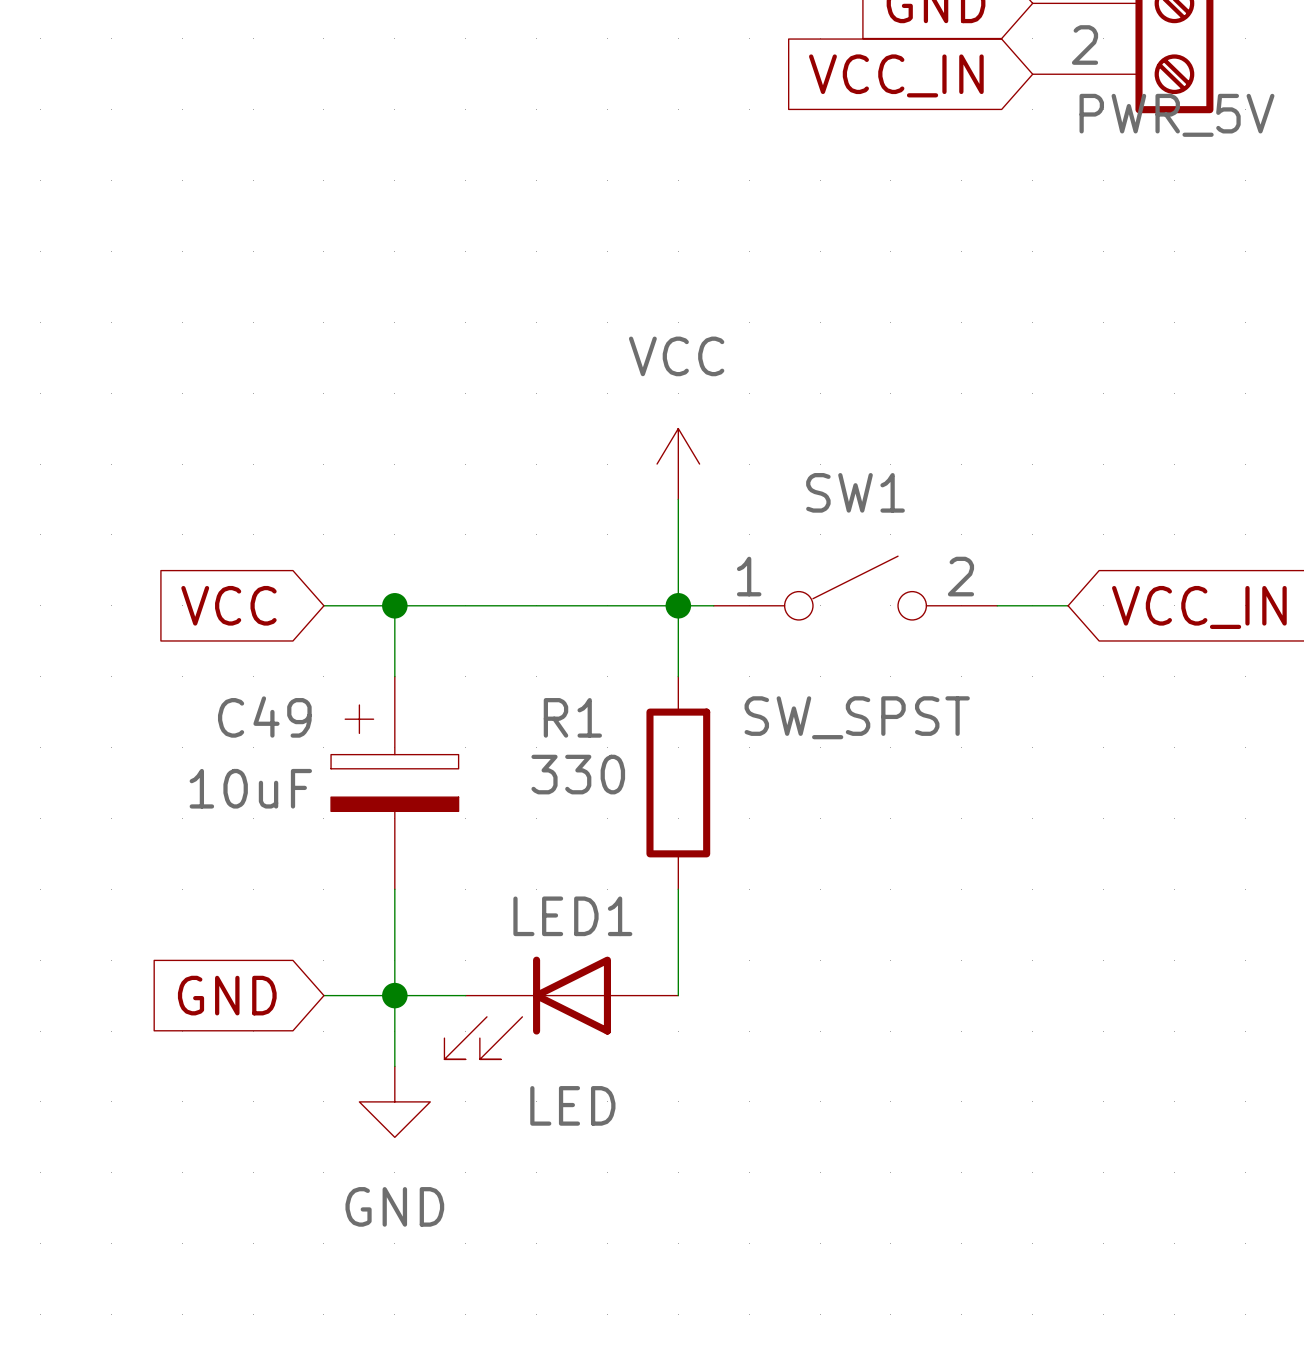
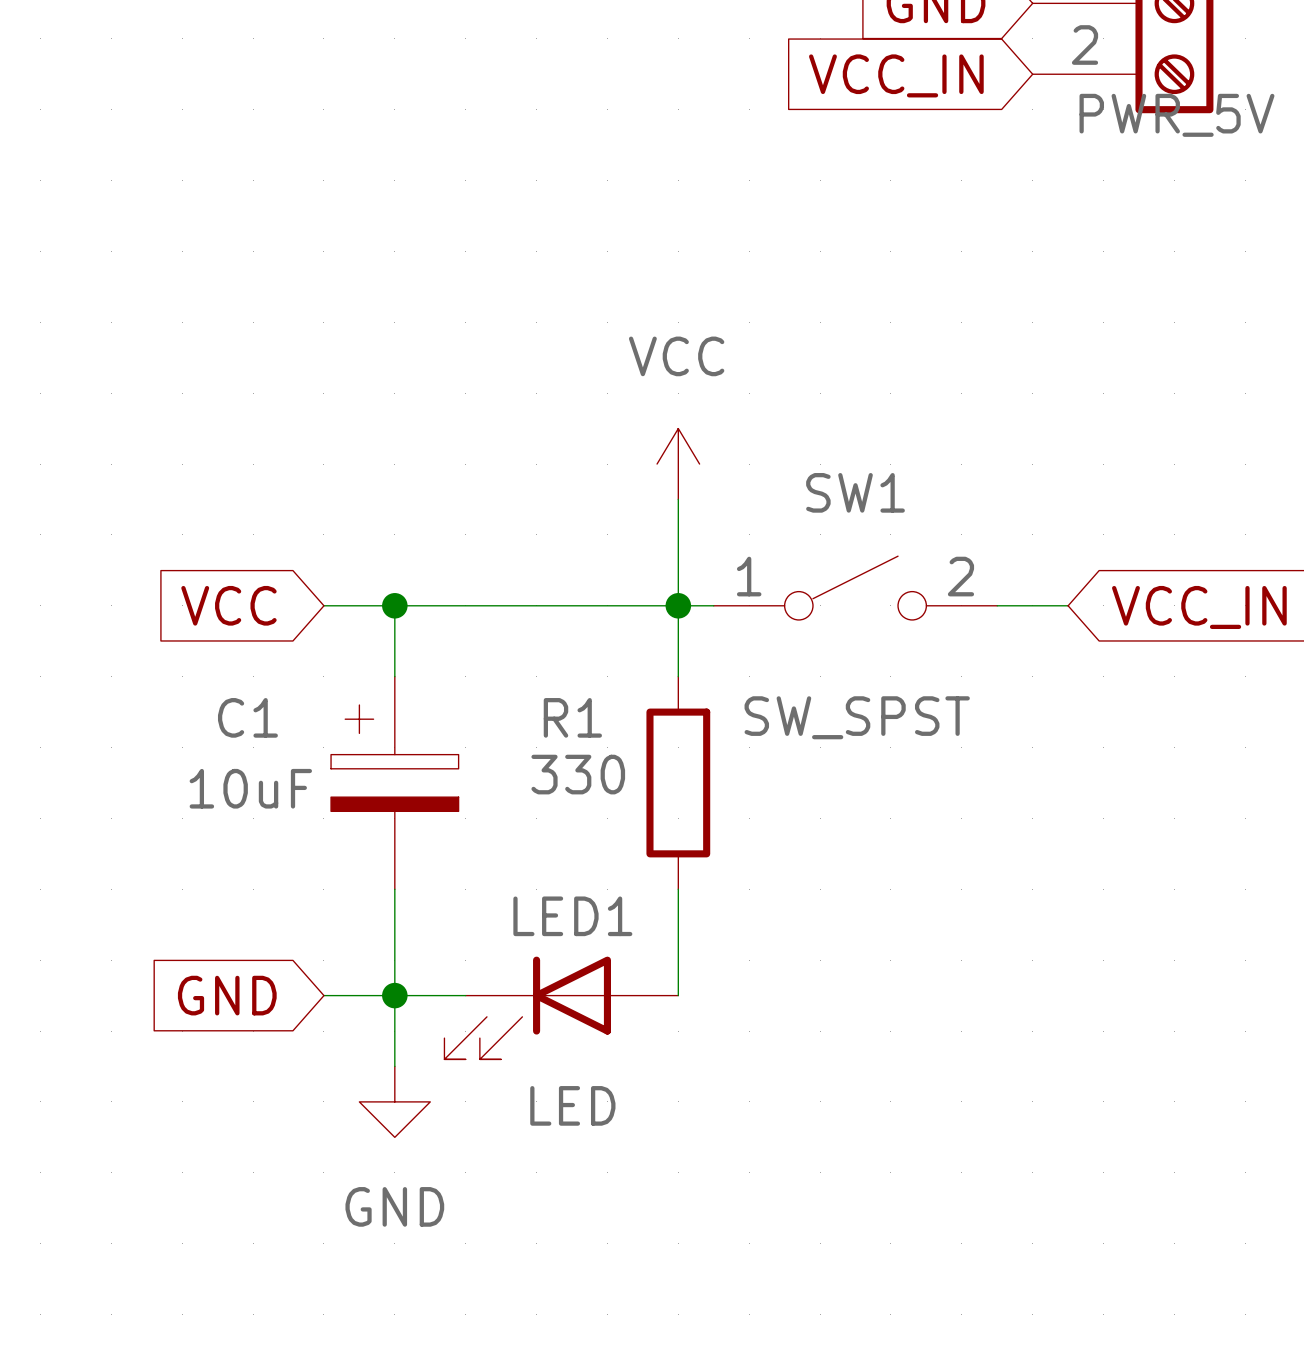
C49 name: C49 (264, 717) -> C1 (247, 717)

